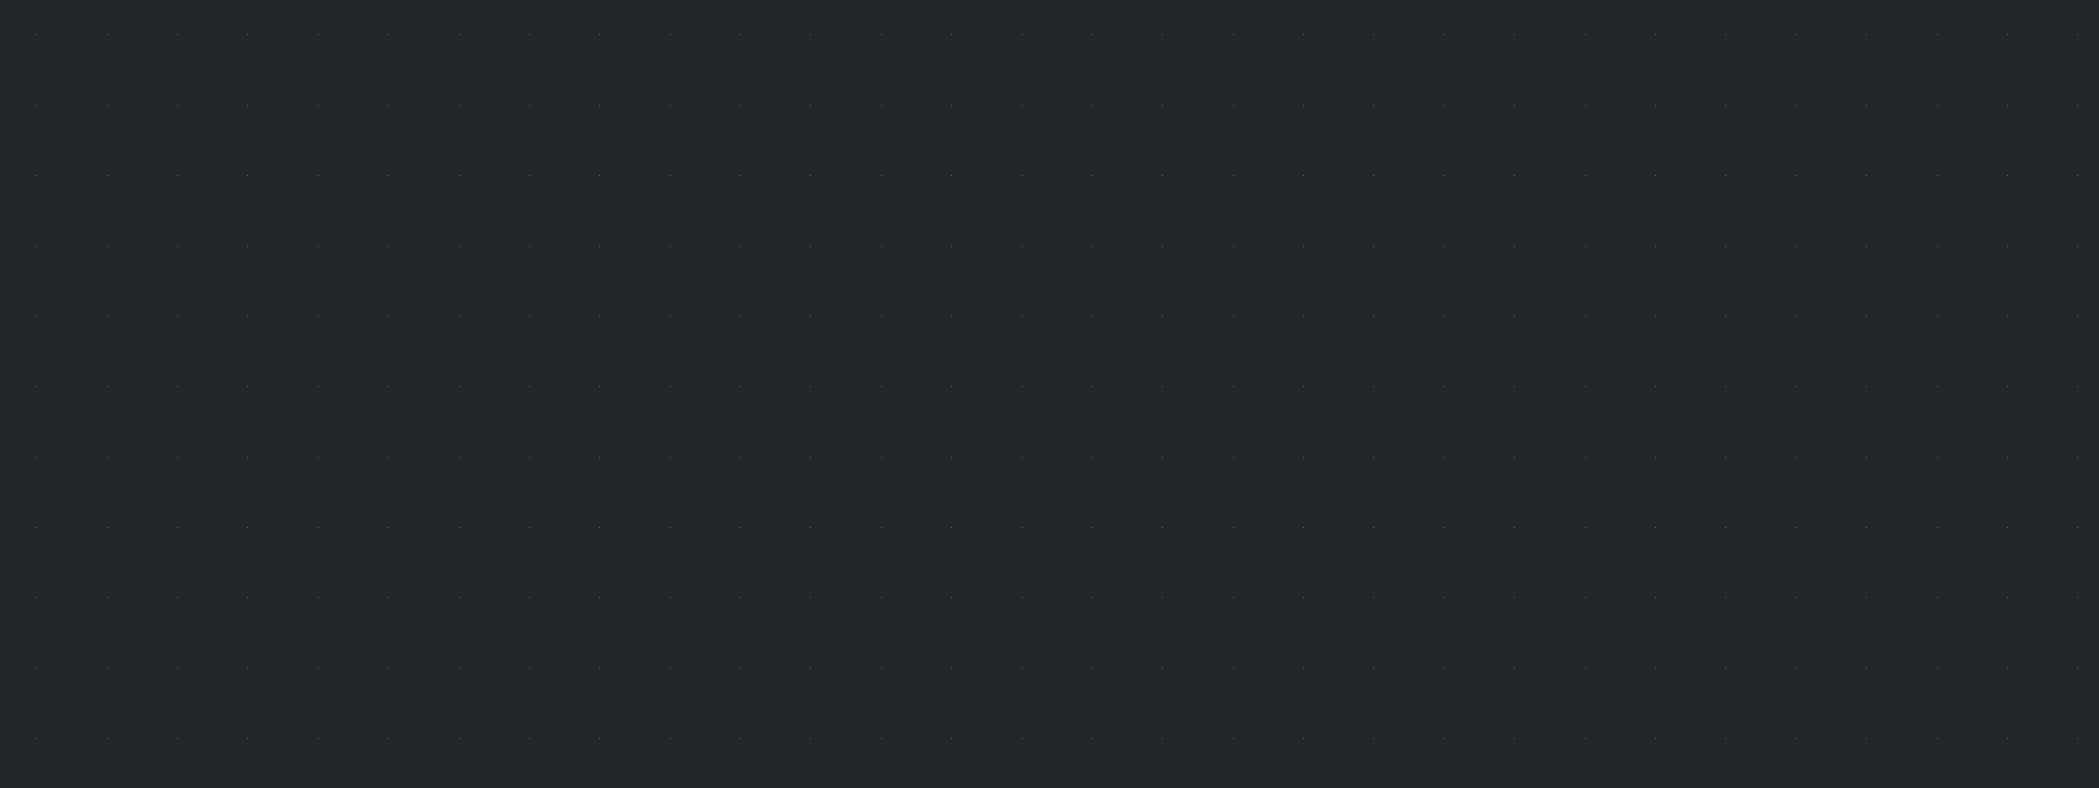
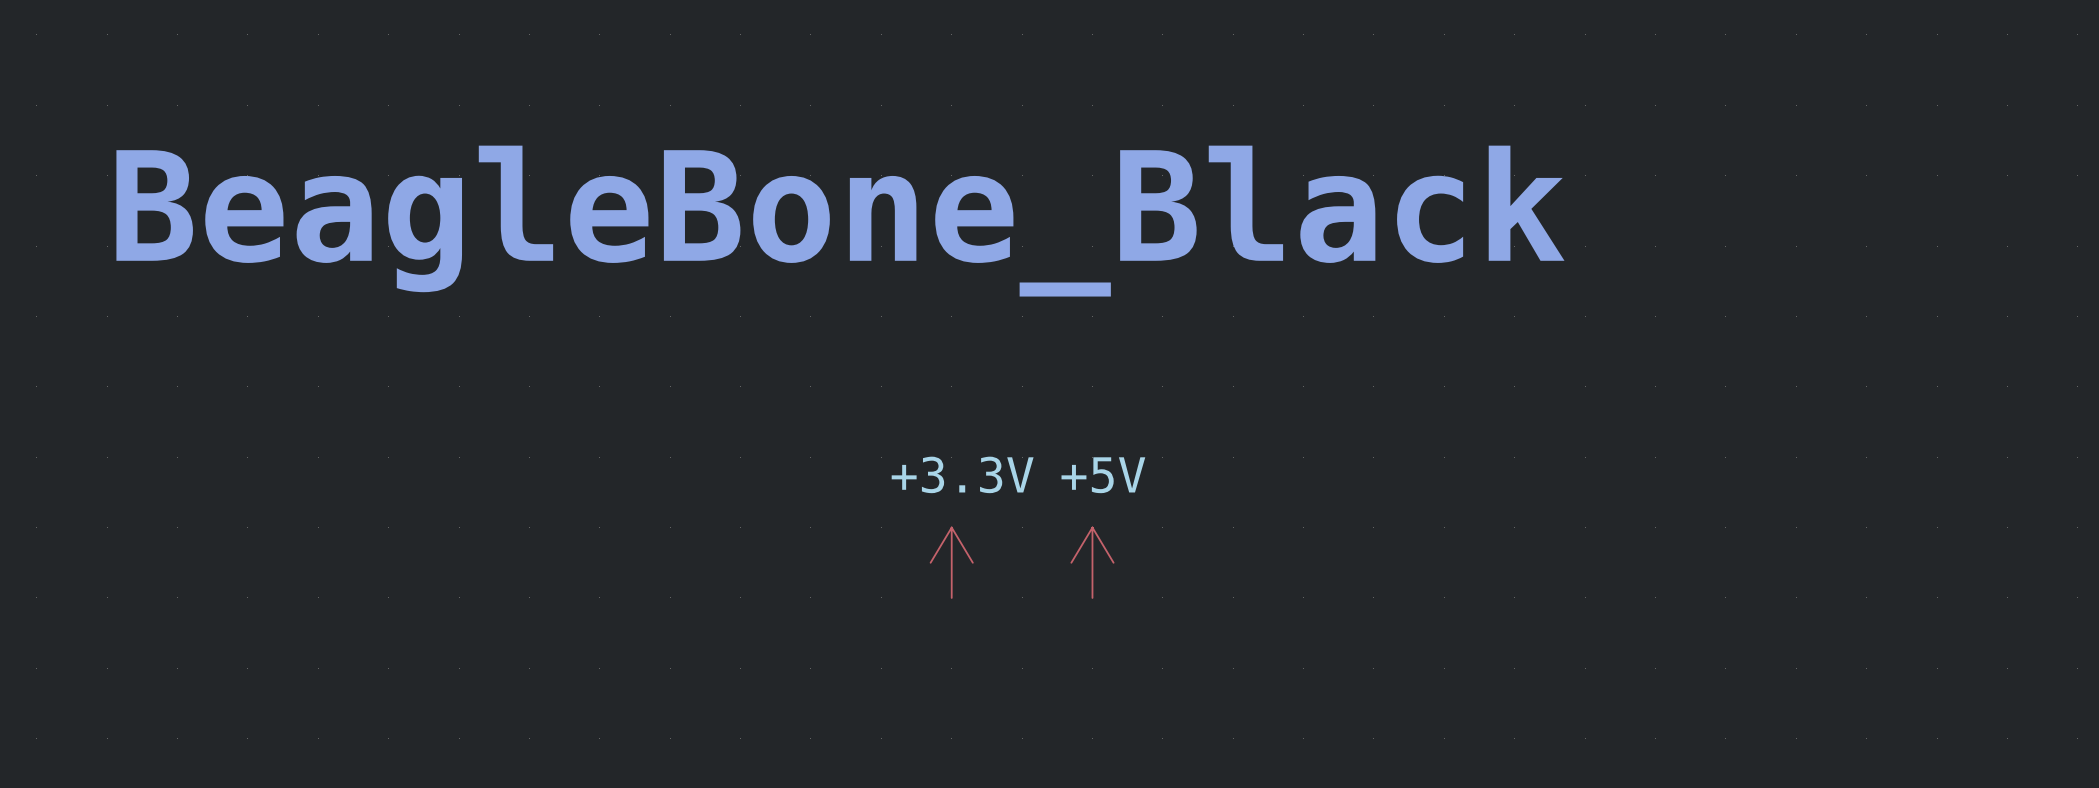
text: none -> BeagleBone_Black (840, 221)
power symbol: none -> +3.3V (951, 562)
power symbol: none -> +5V (1092, 562)

